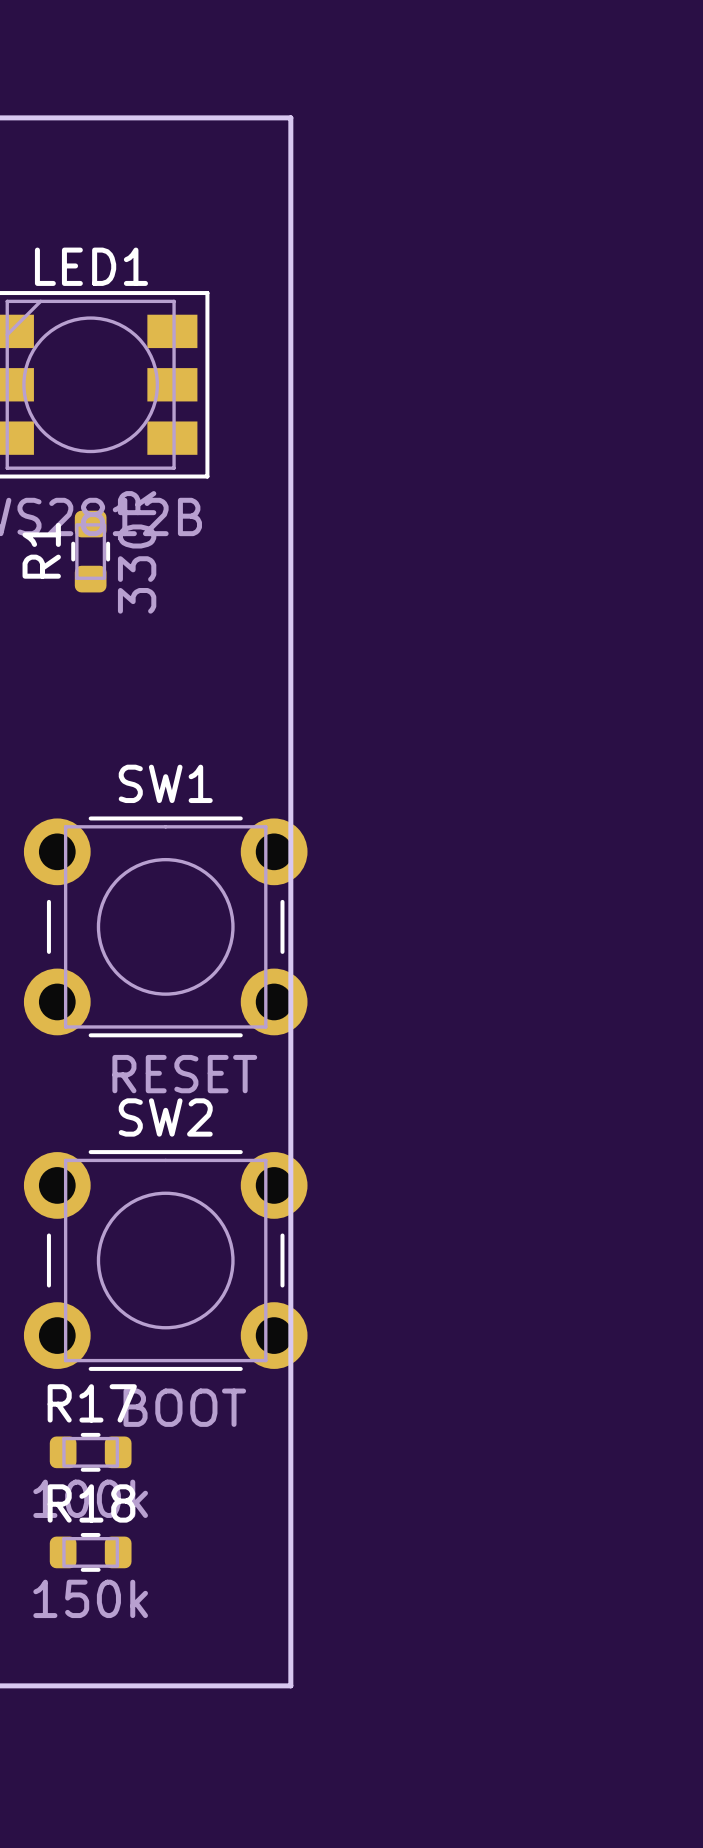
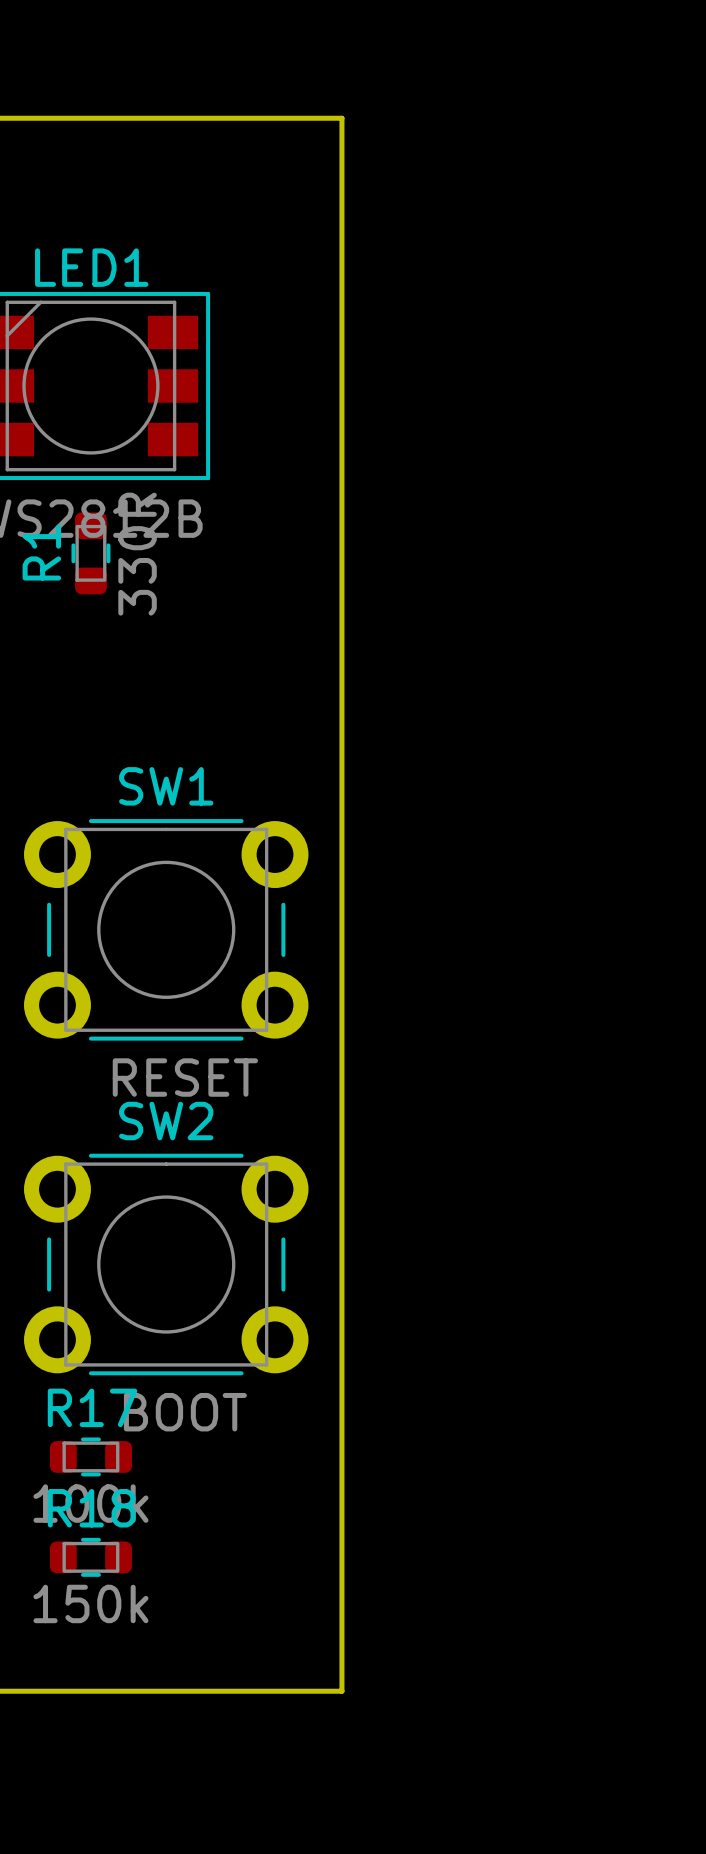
board edge: (290, 117) (290, 1685) -> (291, 118) (341, 118) (341, 1691) (291, 1691)

